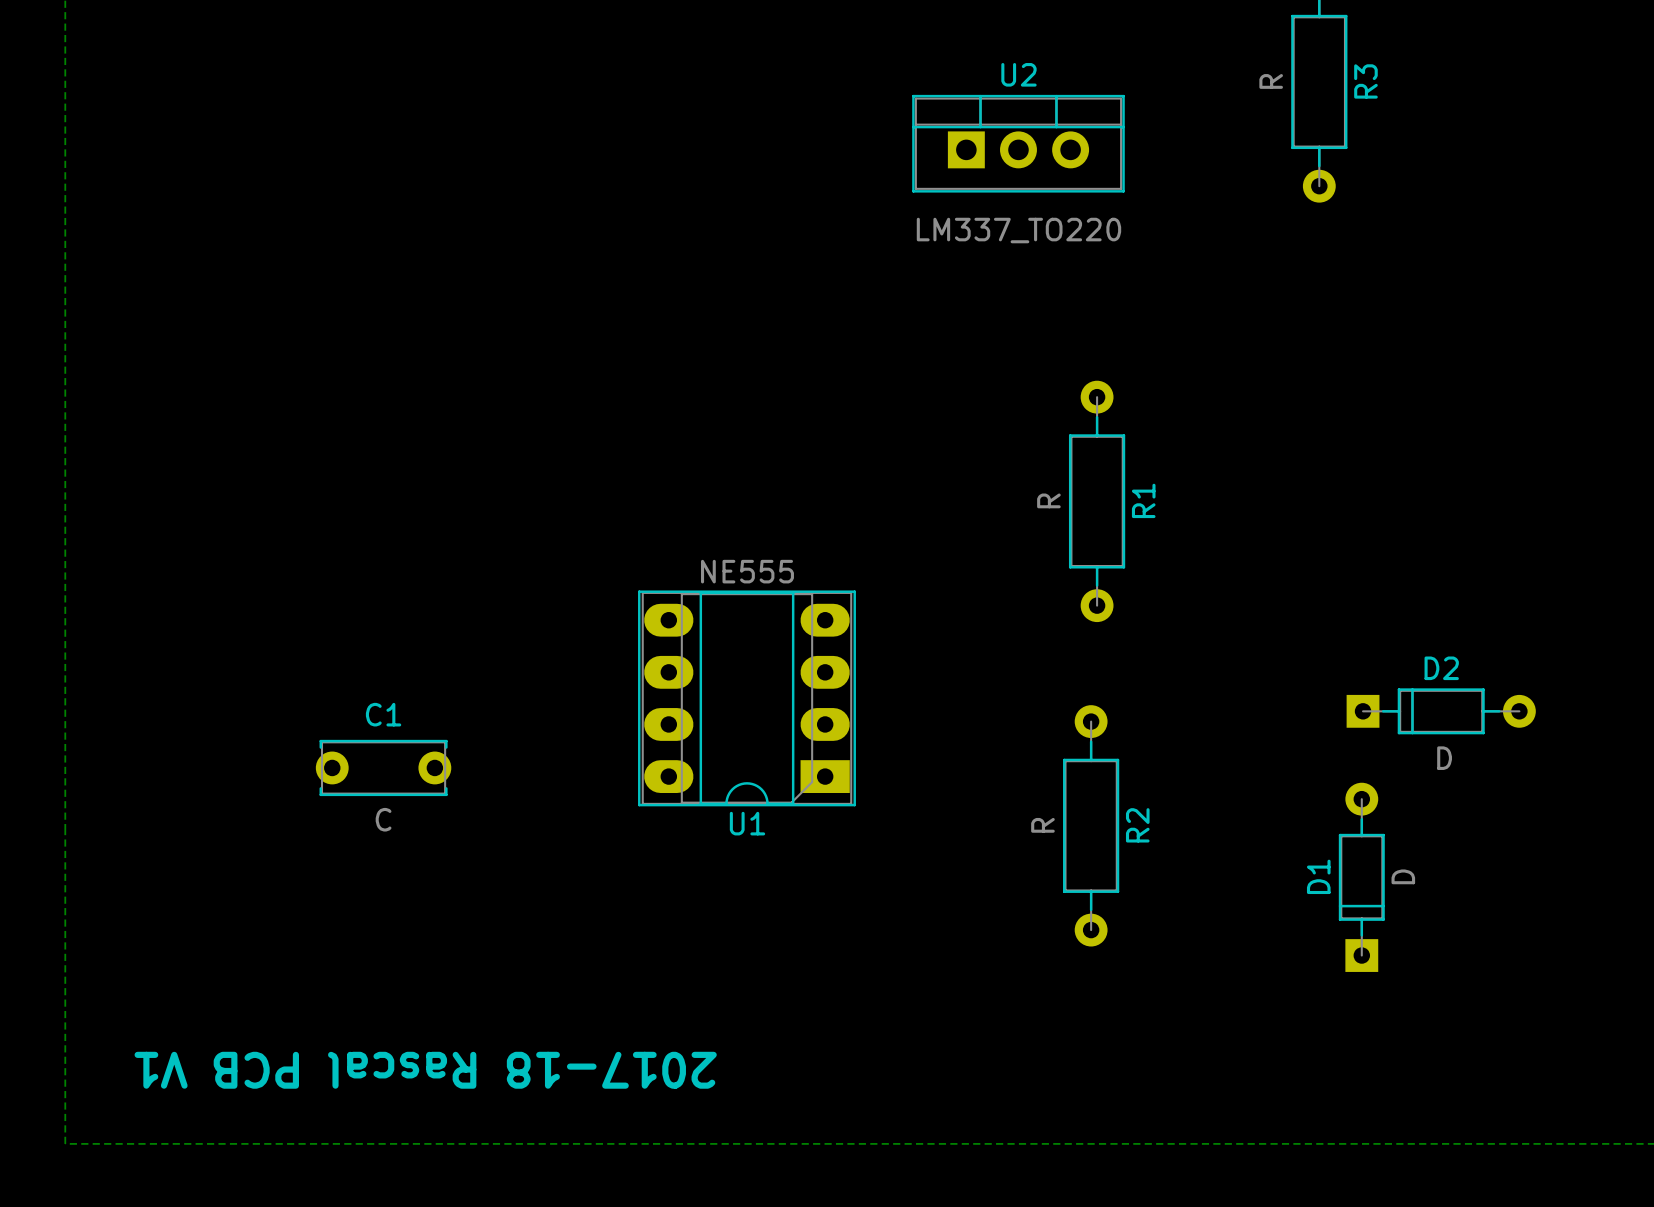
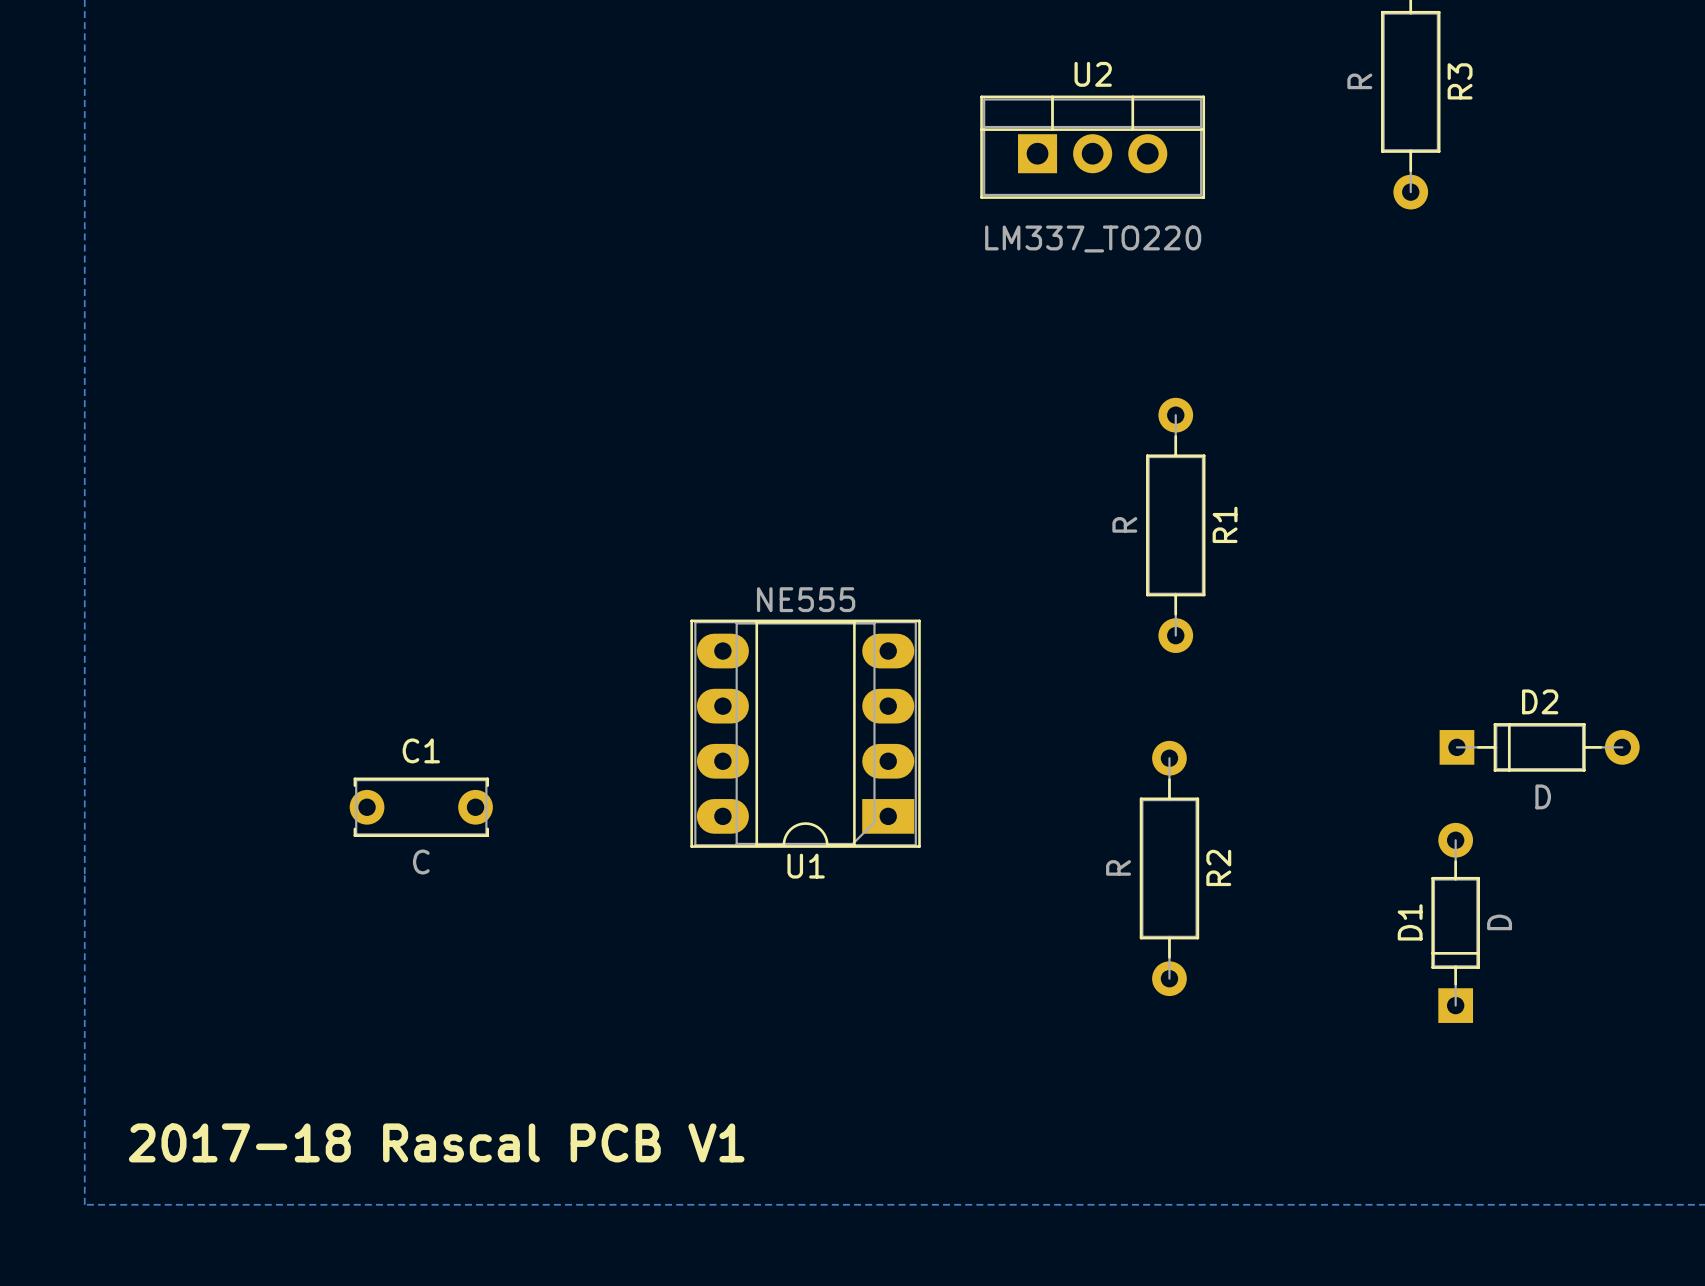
text rotation: 0° (425, 1070) -> 180° (436, 1142)

